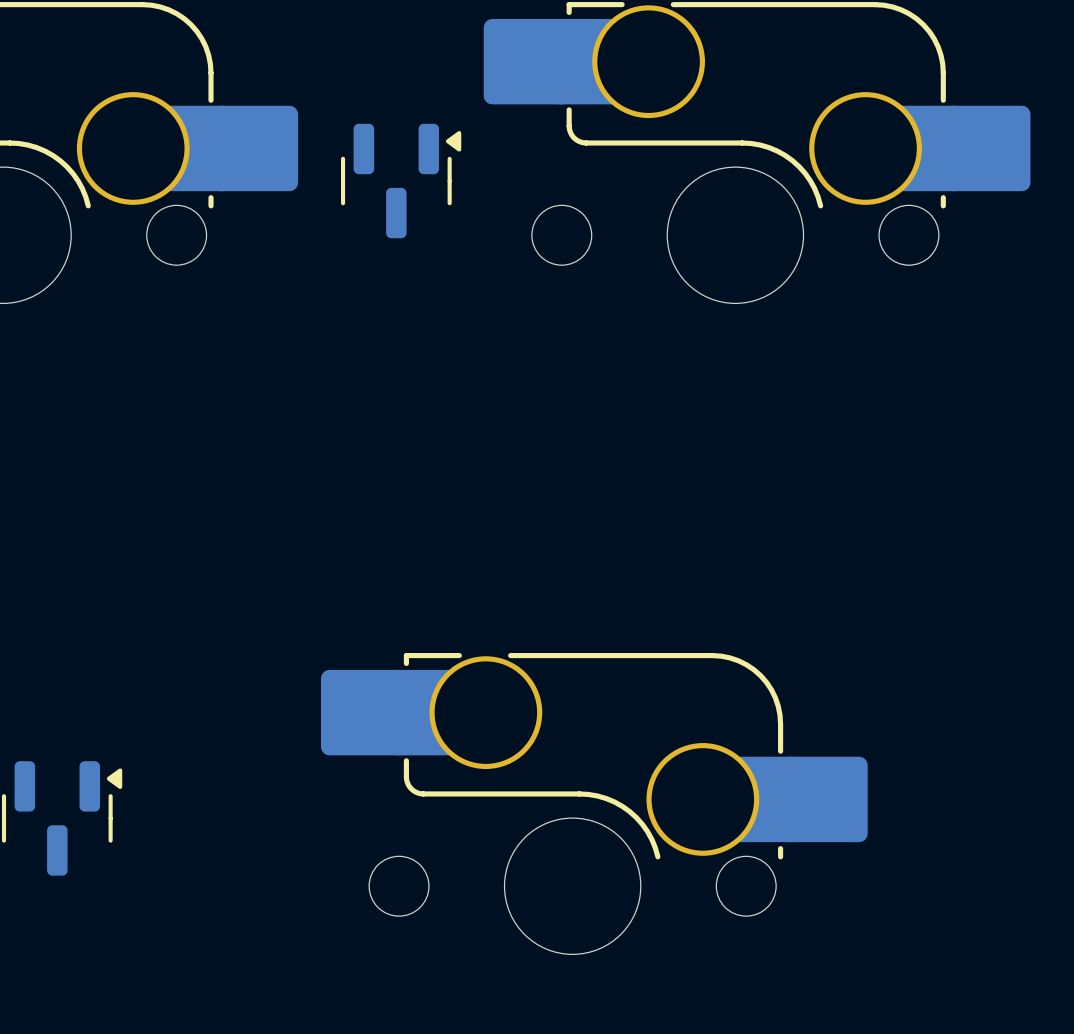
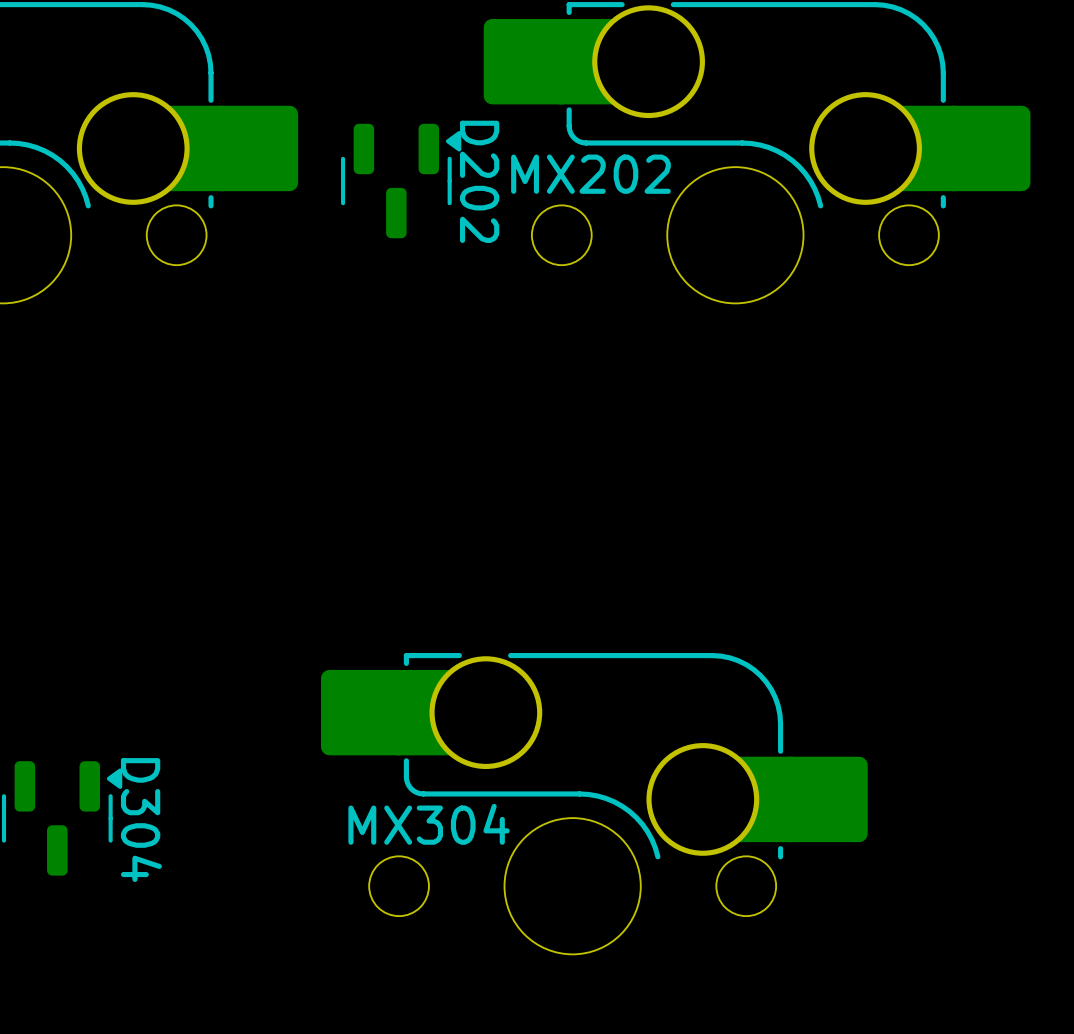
MX202 name: none -> MX202 (590, 174)
D202 name: none -> D202 (479, 181)
D304 name: none -> D304 (141, 820)
MX304 name: none -> MX304 (429, 824)

